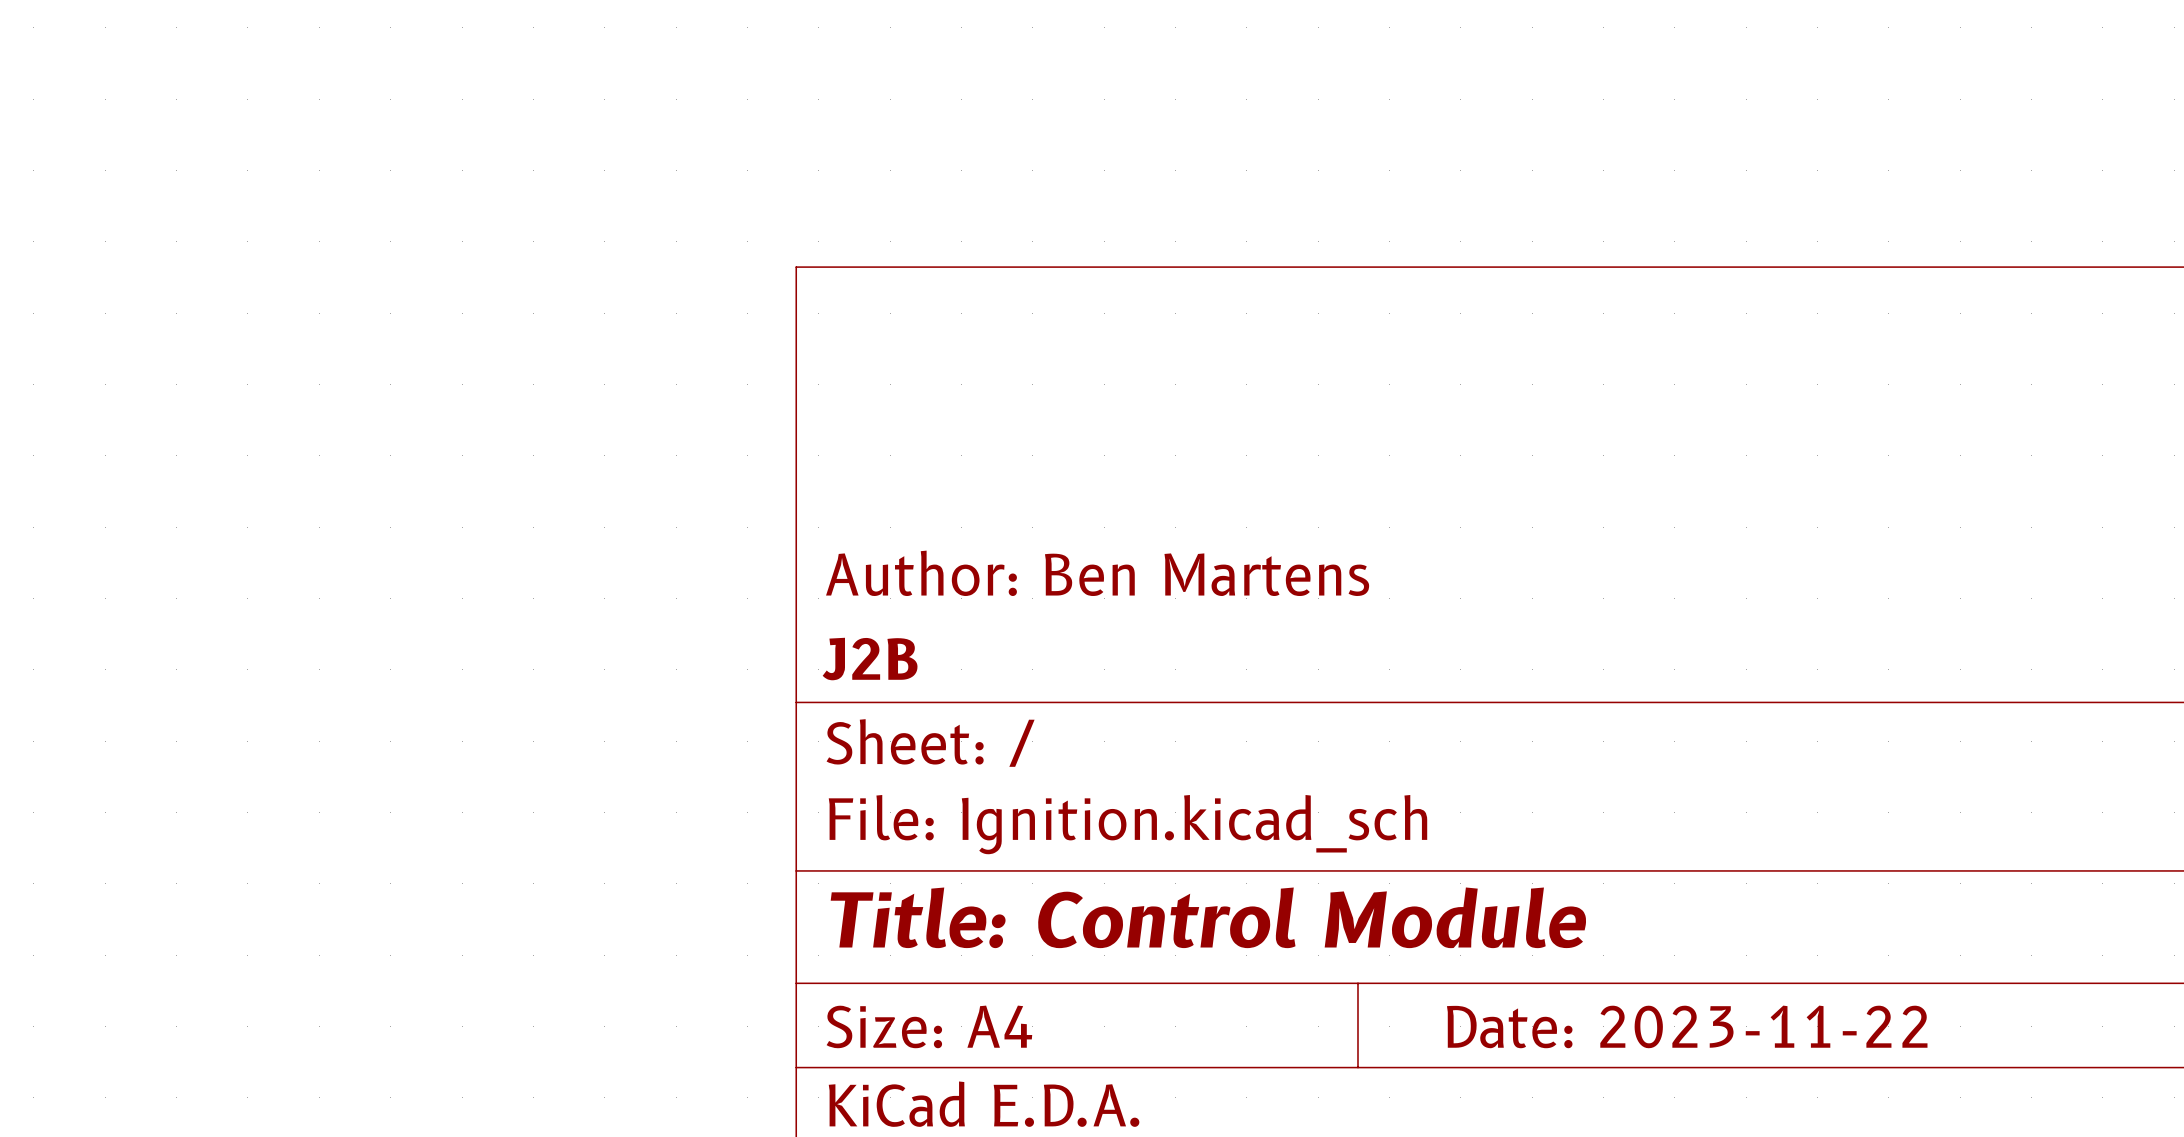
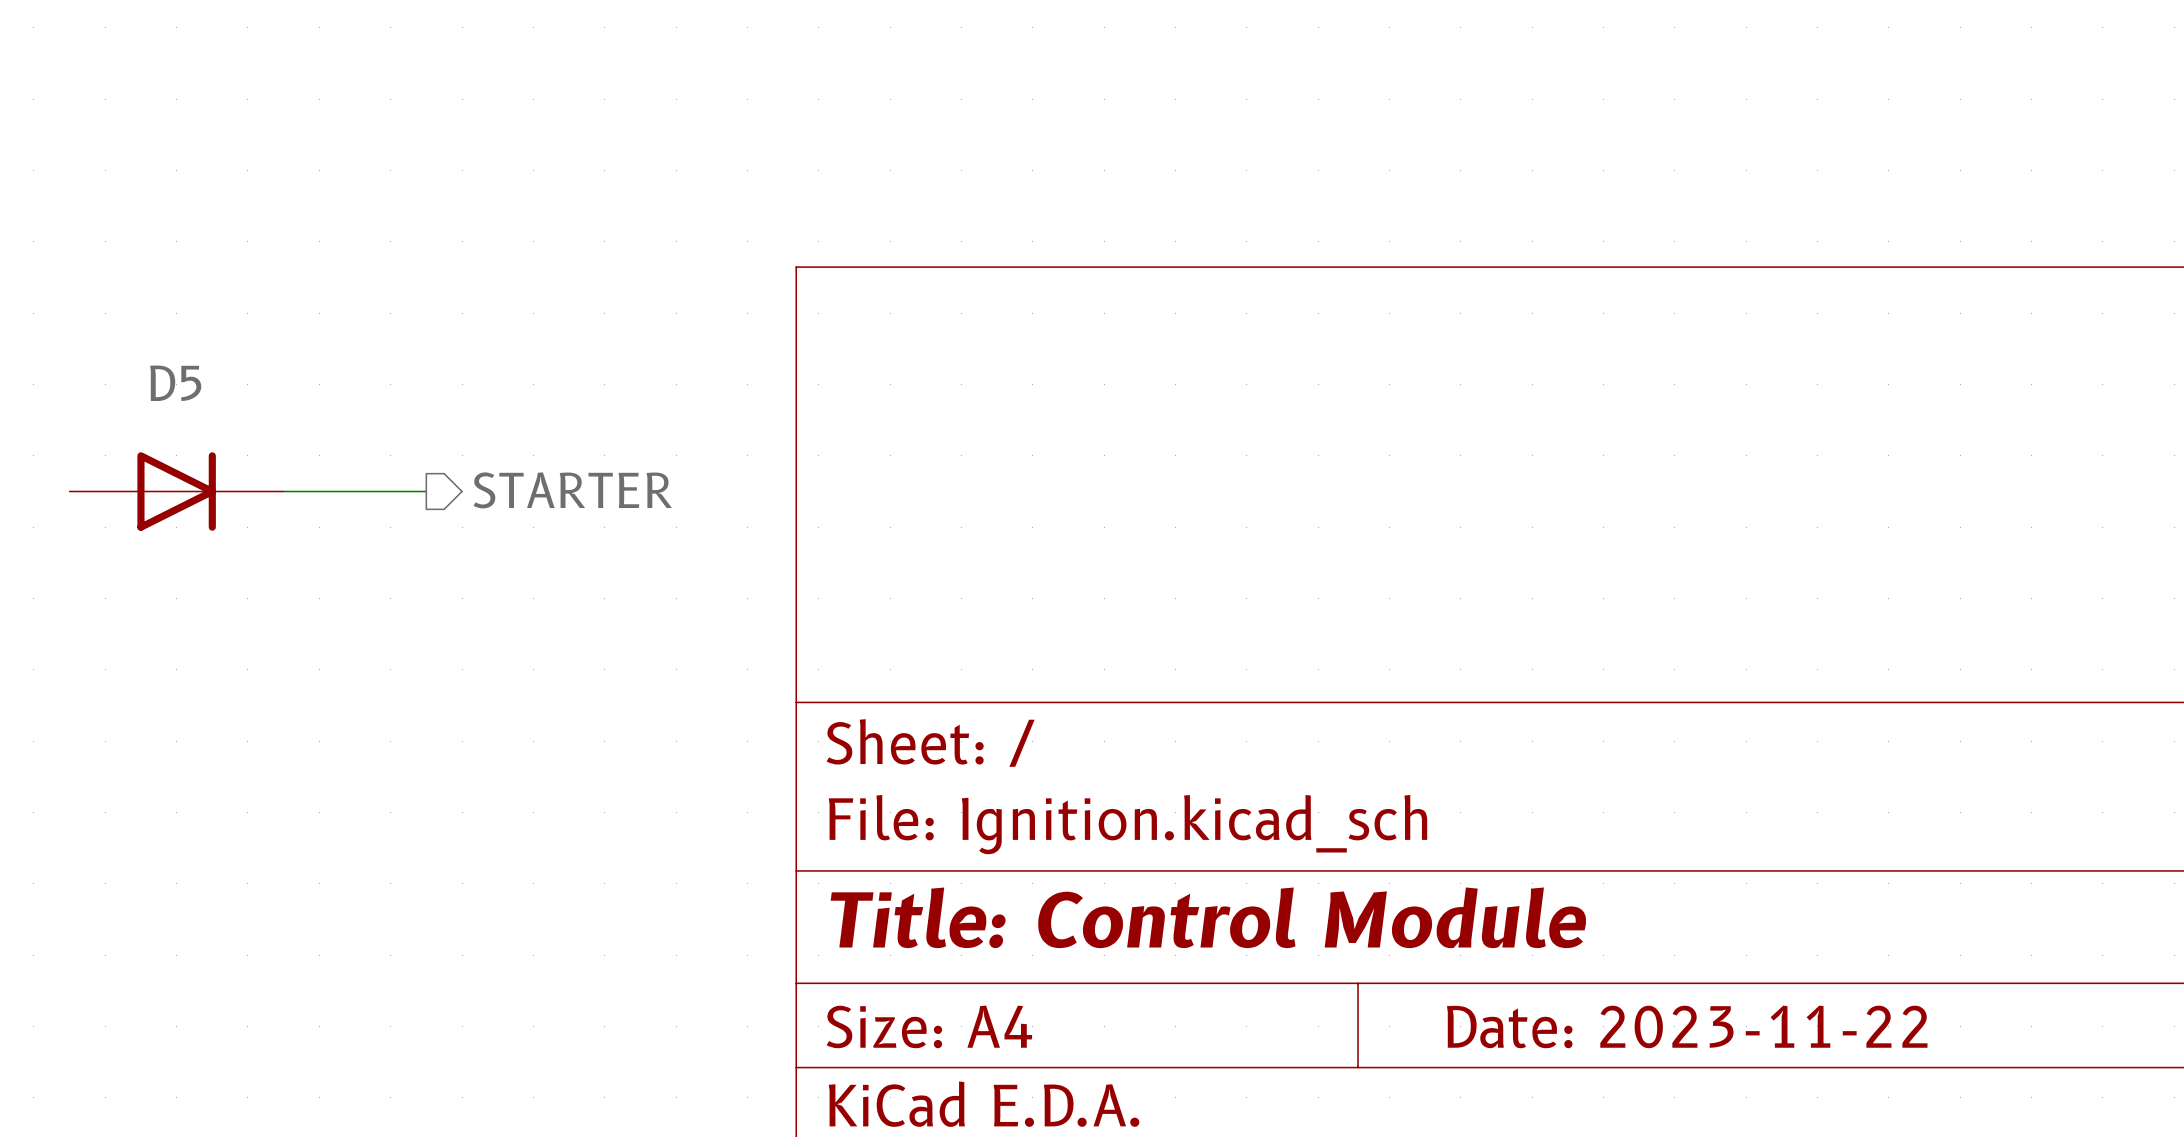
hierarchical label: none -> STARTER (572, 490)
D5: none -> (176, 491)
wire: none -> (283, 491) (426, 491)
title block: Author: Ben Martens (1097, 573) -> none
title block: J2B (870, 659) -> none

